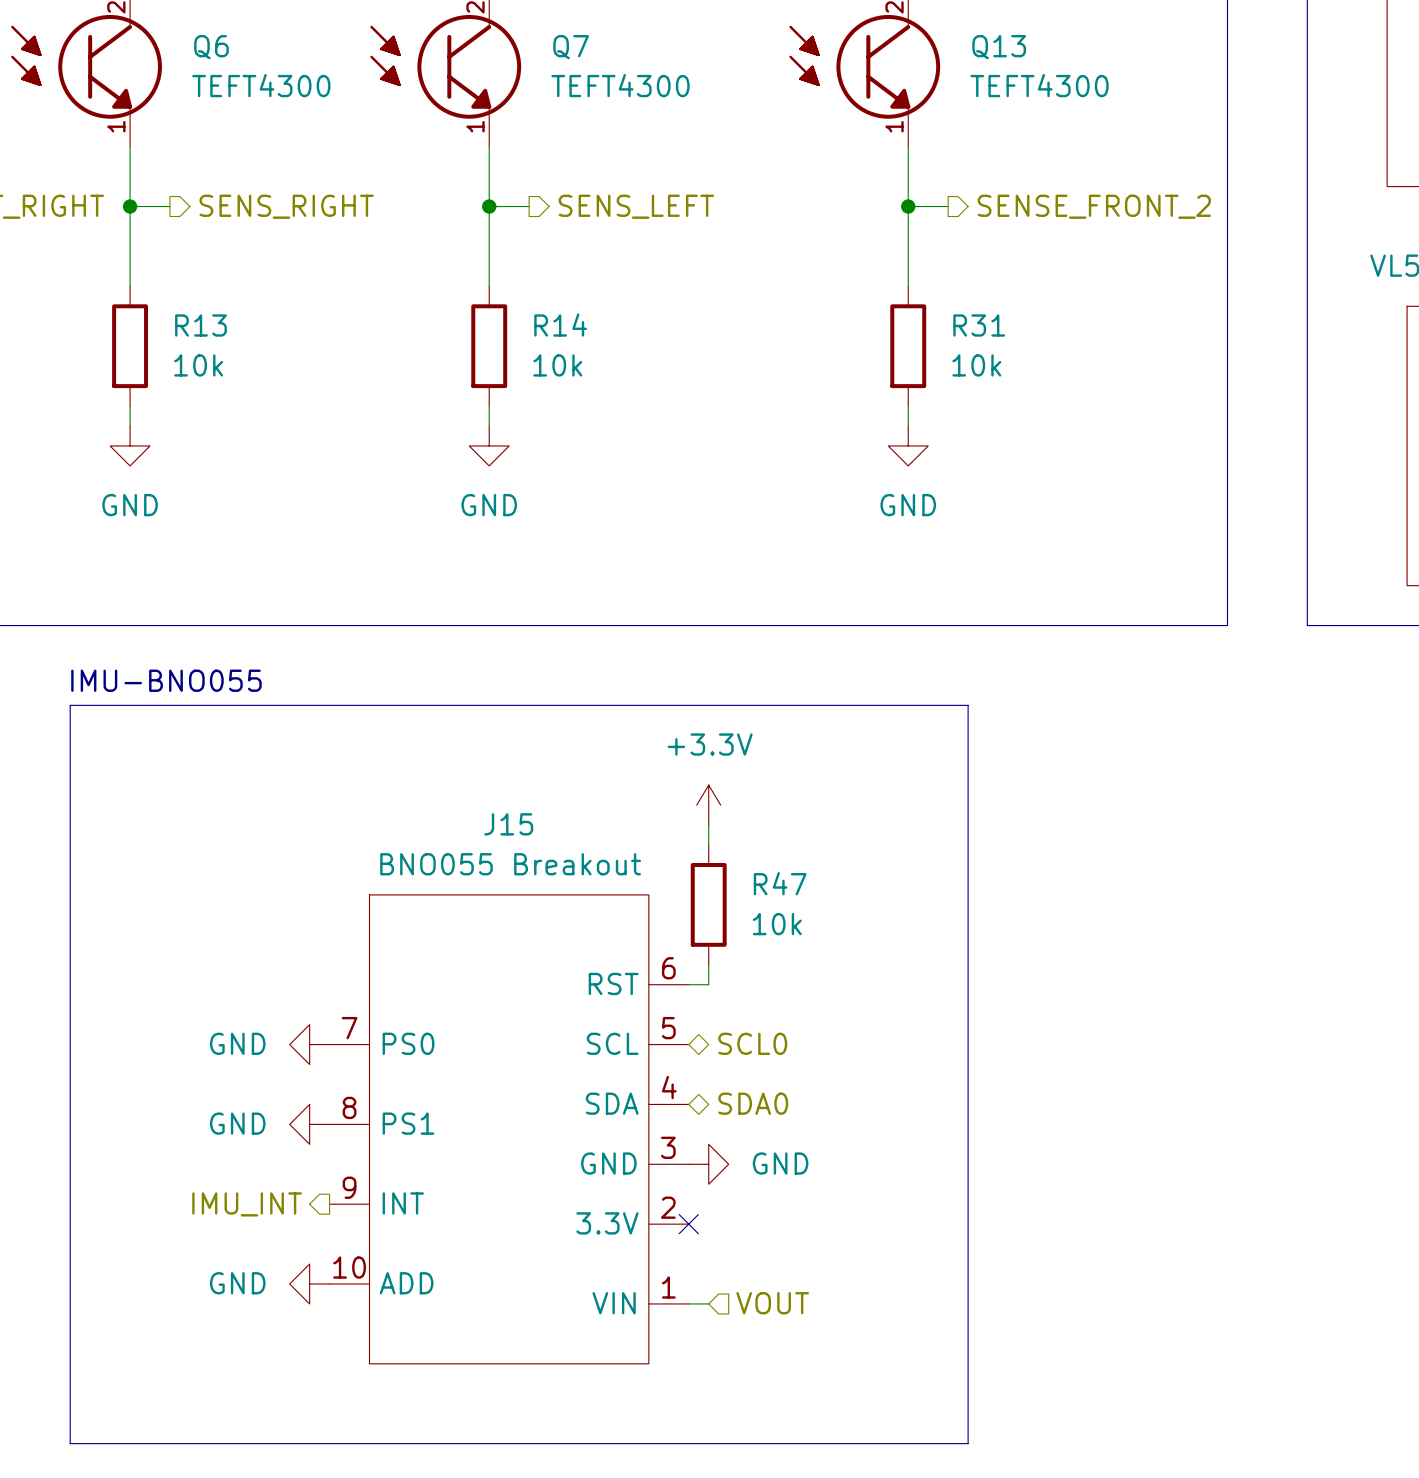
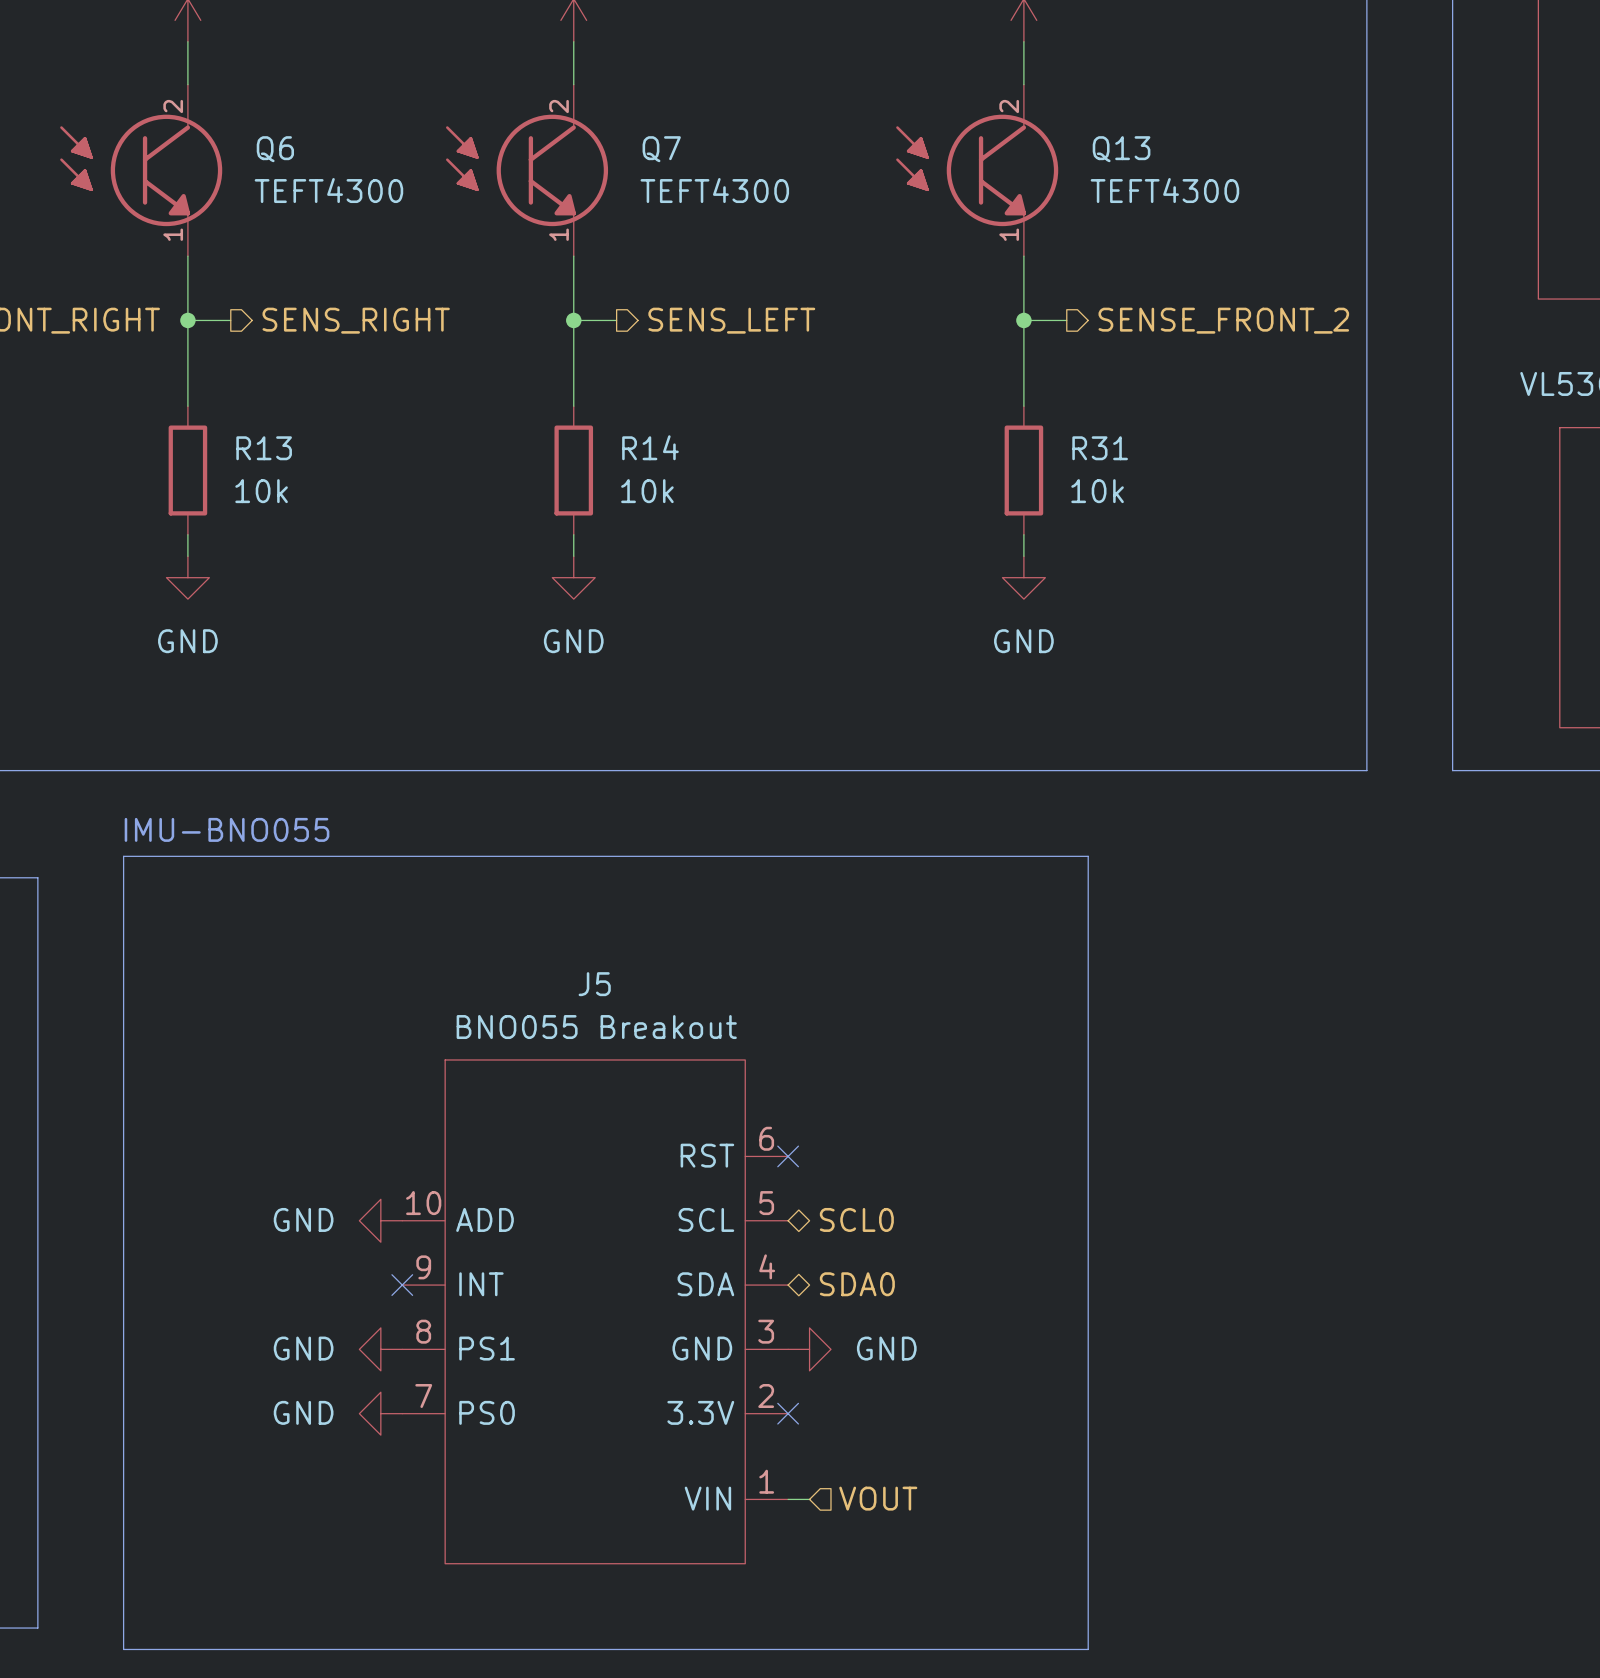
power symbol: +3.3V (708, 805) -> none
wire: (708, 825) (708, 845) -> none
R47: 10k (708, 904) -> none
wire: (708, 964) (708, 984) (688, 984) -> none
no-connect mark: none -> (788, 1156)
no-connect mark: none -> (402, 1285)
power symbol position: GND (309, 1124) -> GND (380, 1349)
J15: BNO055 Breakout (509, 1129) -> none
J5: none -> BNO055 Breakout (595, 1311)
hierarchical label: IMU_INT (247, 1204) -> none
power symbol: none -> GND (380, 1413)
power symbol: GND (309, 1284) -> none

